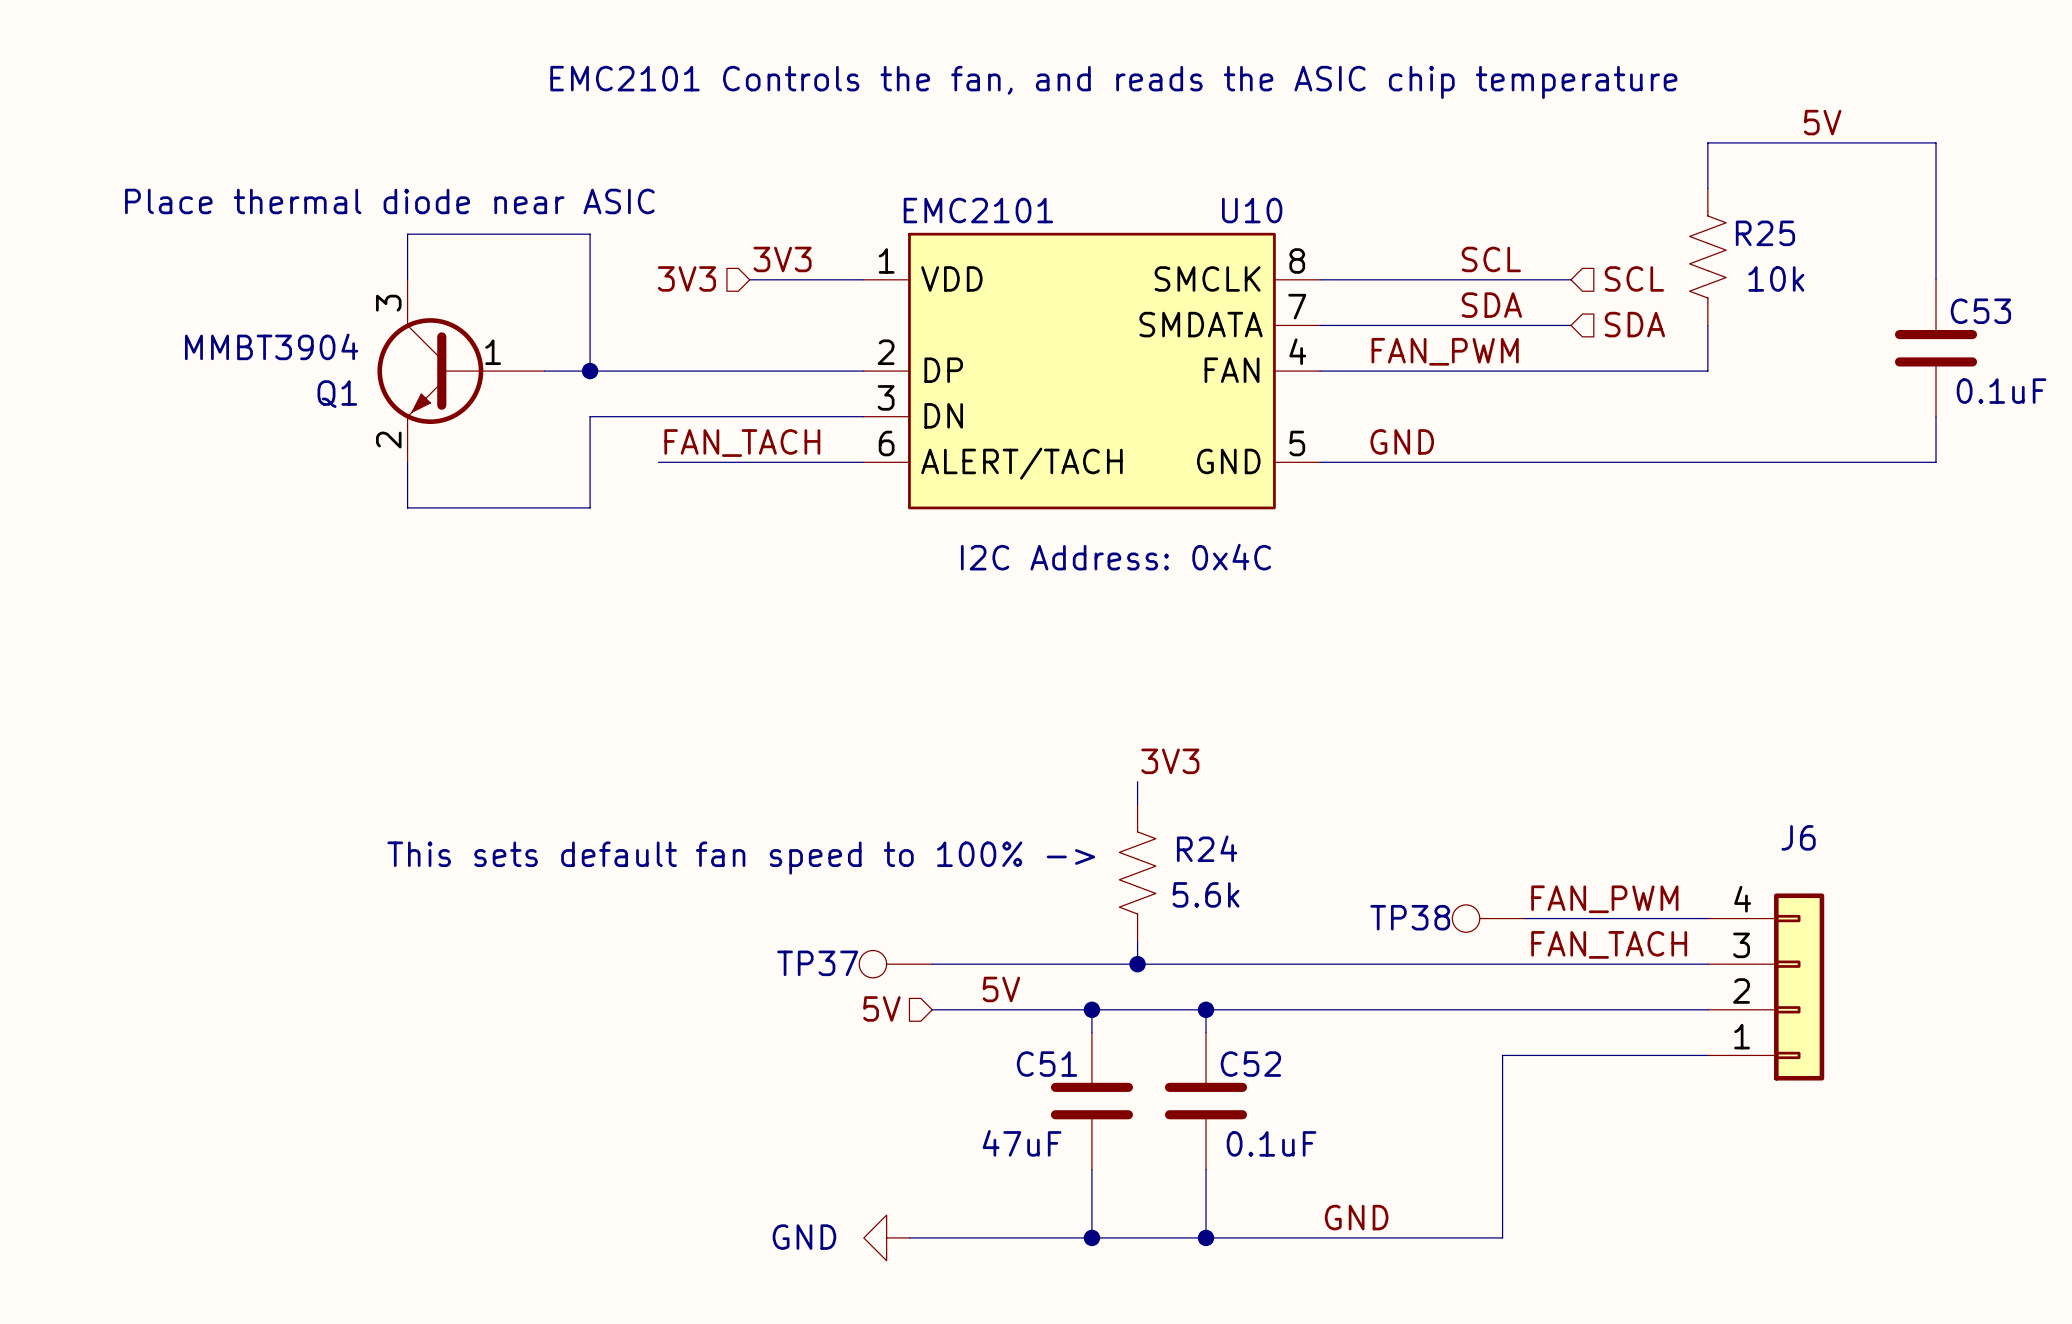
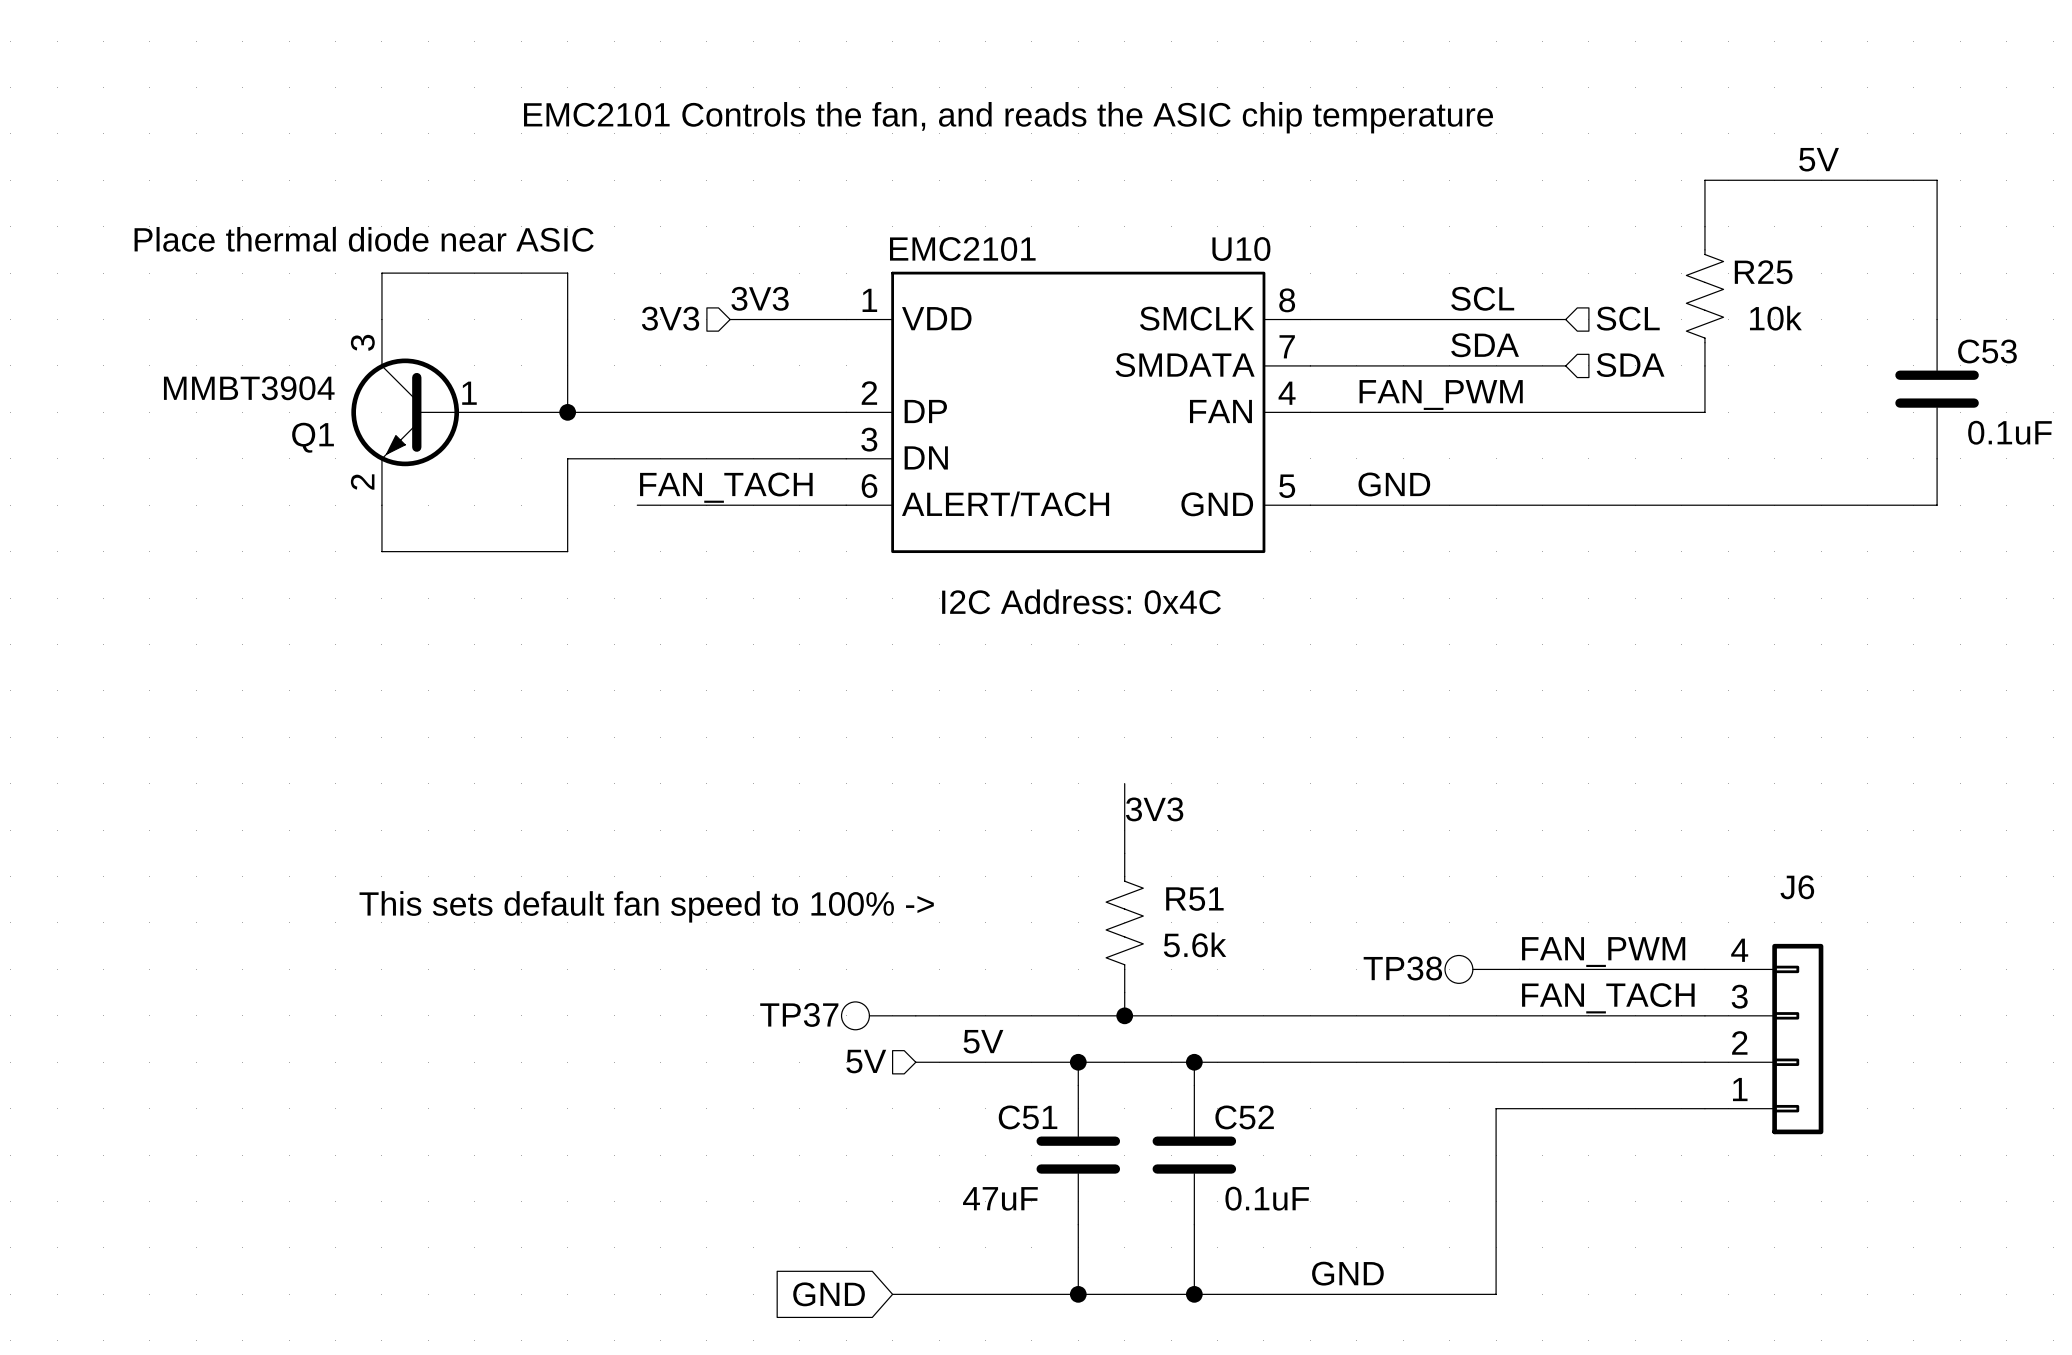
wire: none -> (1124, 783) (1124, 830)
R24 name: R24 (1207, 848) -> R51 (1194, 899)
global label: none -> GND (829, 1294)
power symbol: GND (886, 1237) -> none

